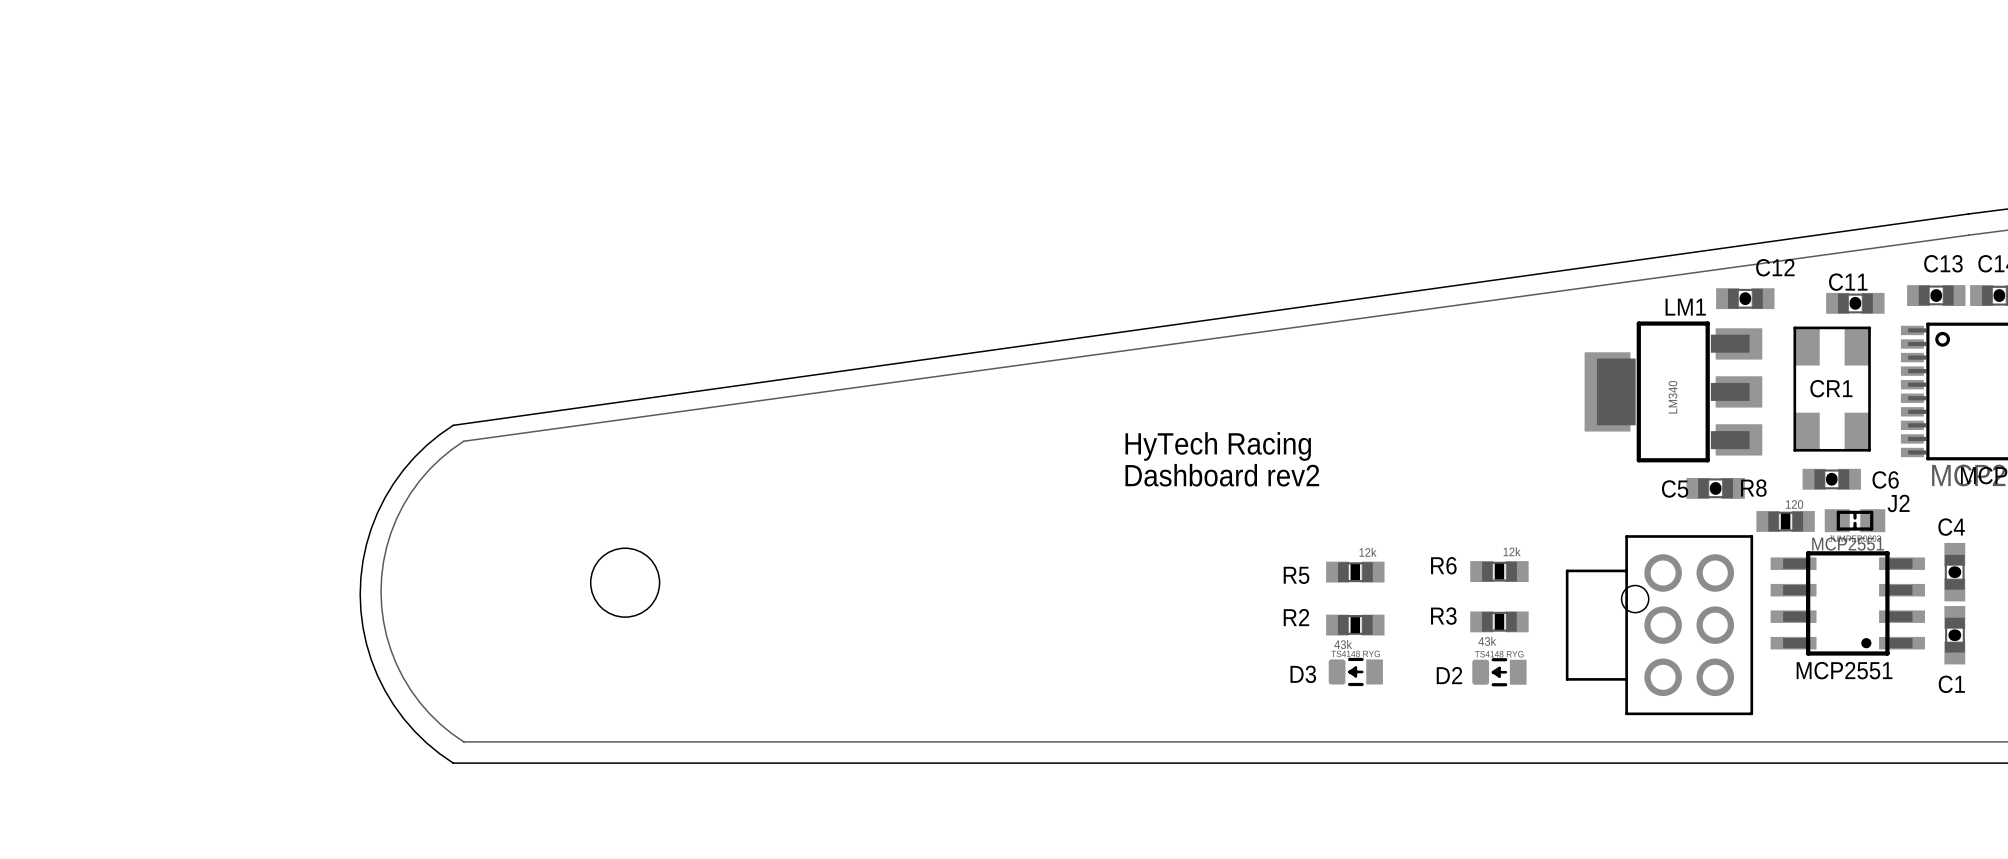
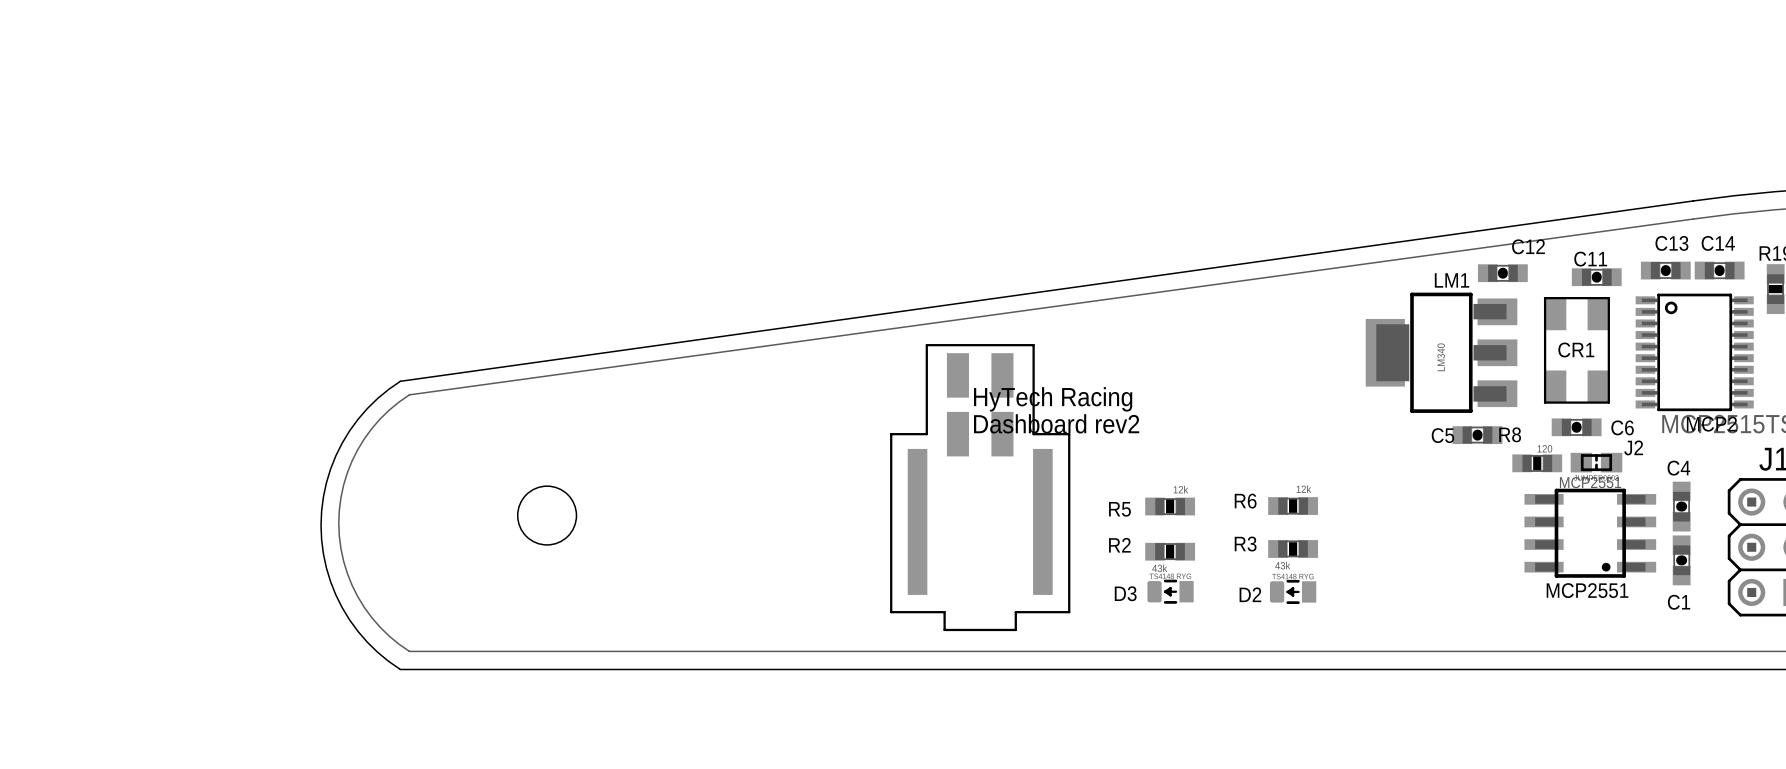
part: none -> (980, 487)
part: (1659, 625) -> none

